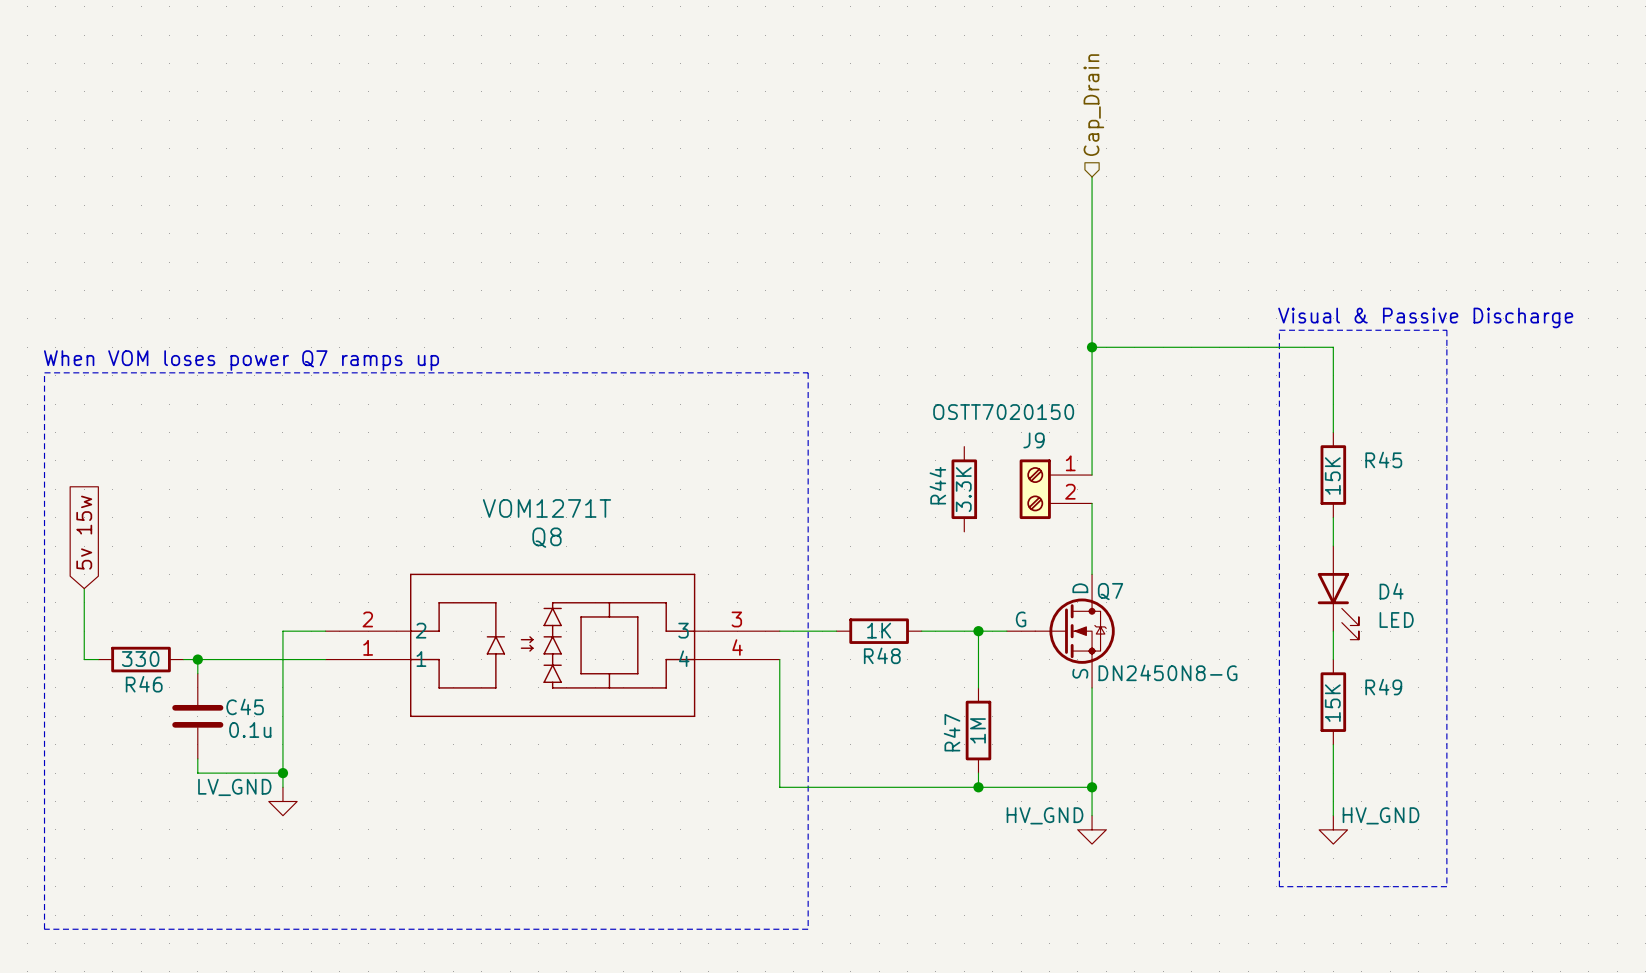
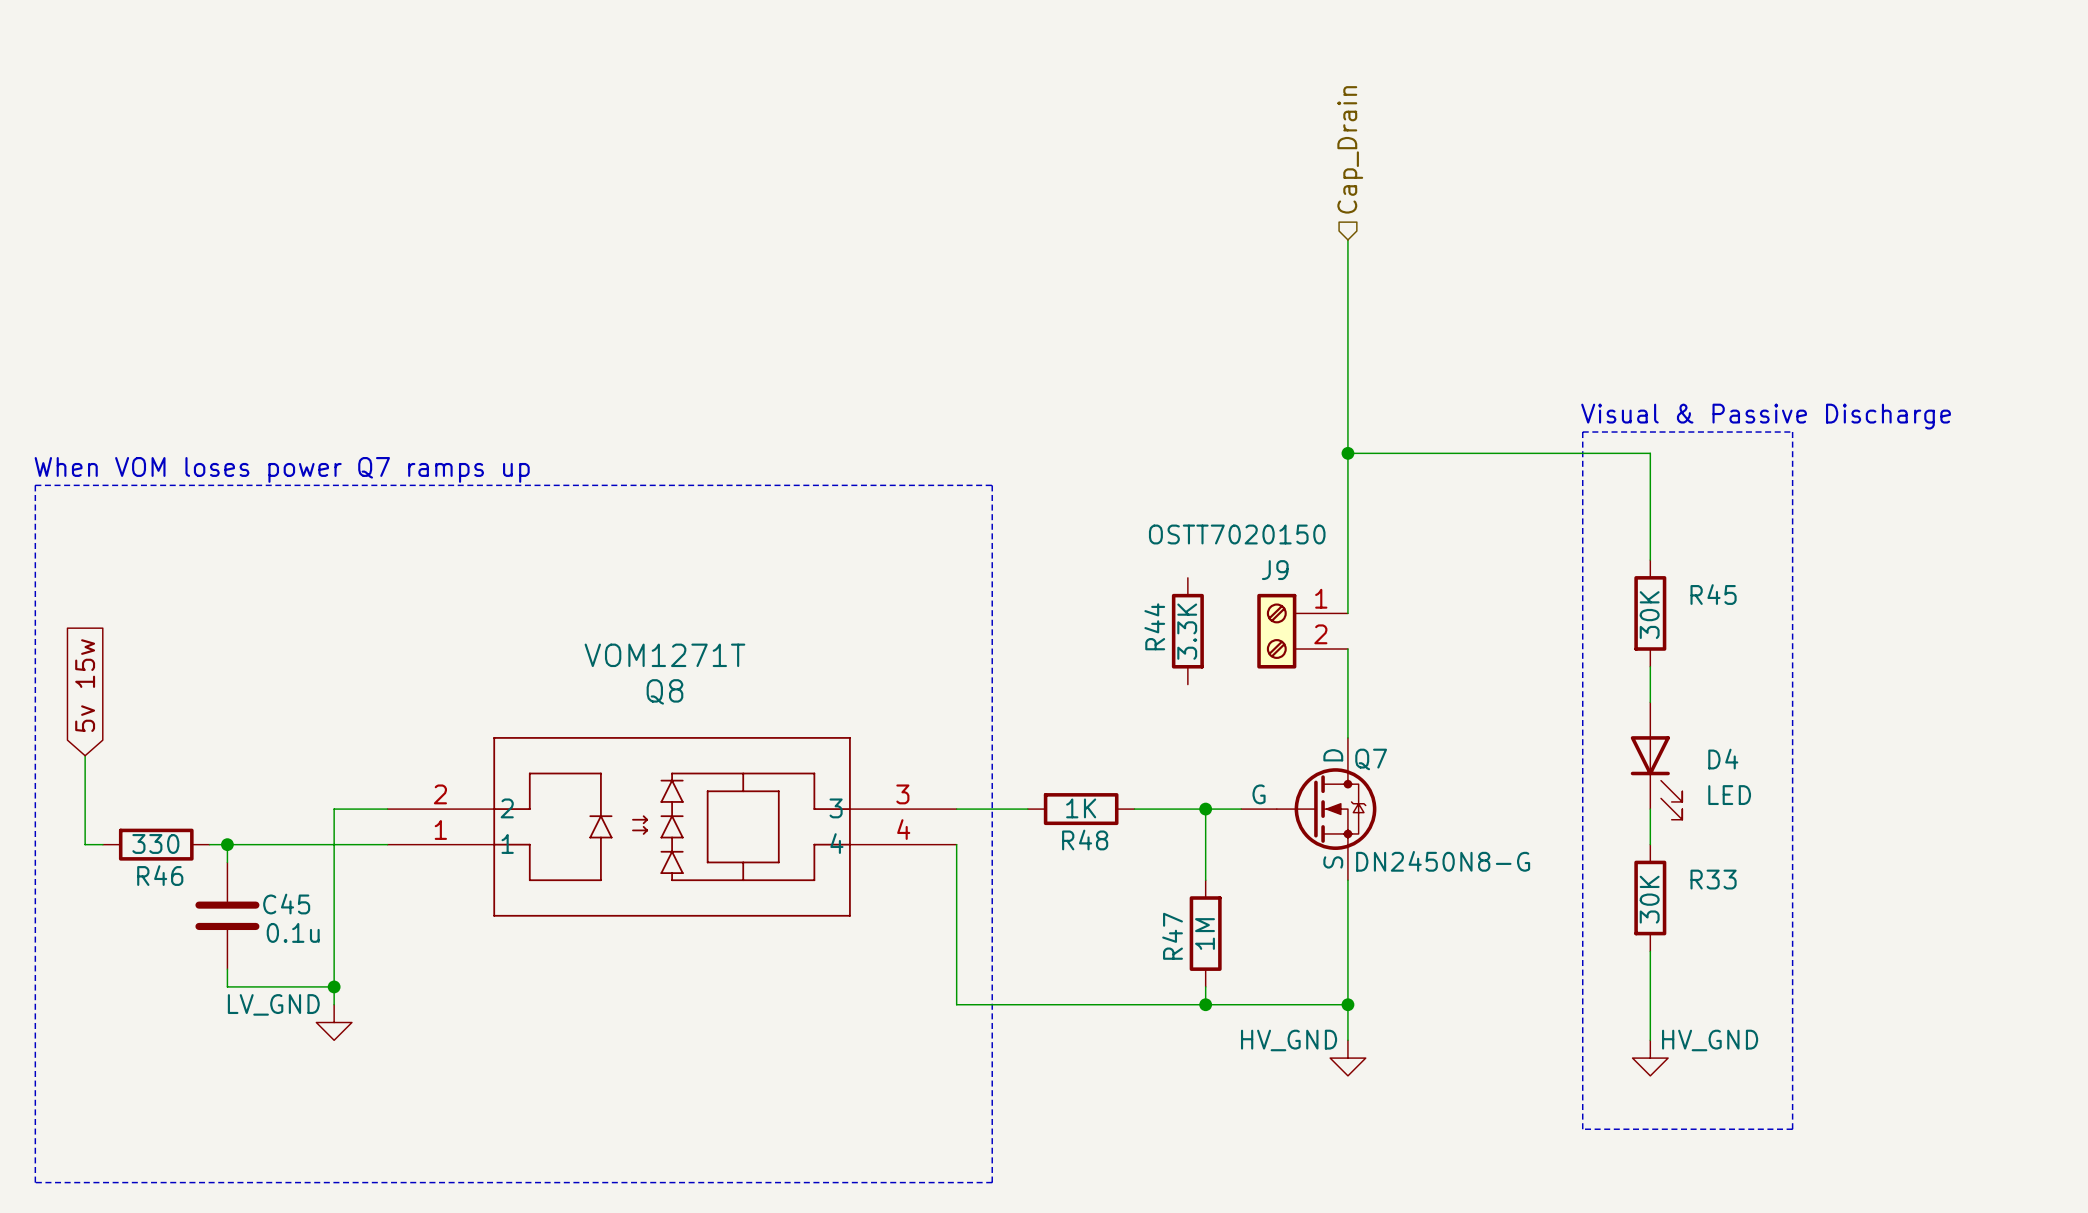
R45 value: 15K (1332, 476) -> 30K (1649, 615)
R49 name: R49 (1383, 687) -> R33 (1713, 879)
R49 value: 15K (1332, 703) -> 30K (1649, 899)

